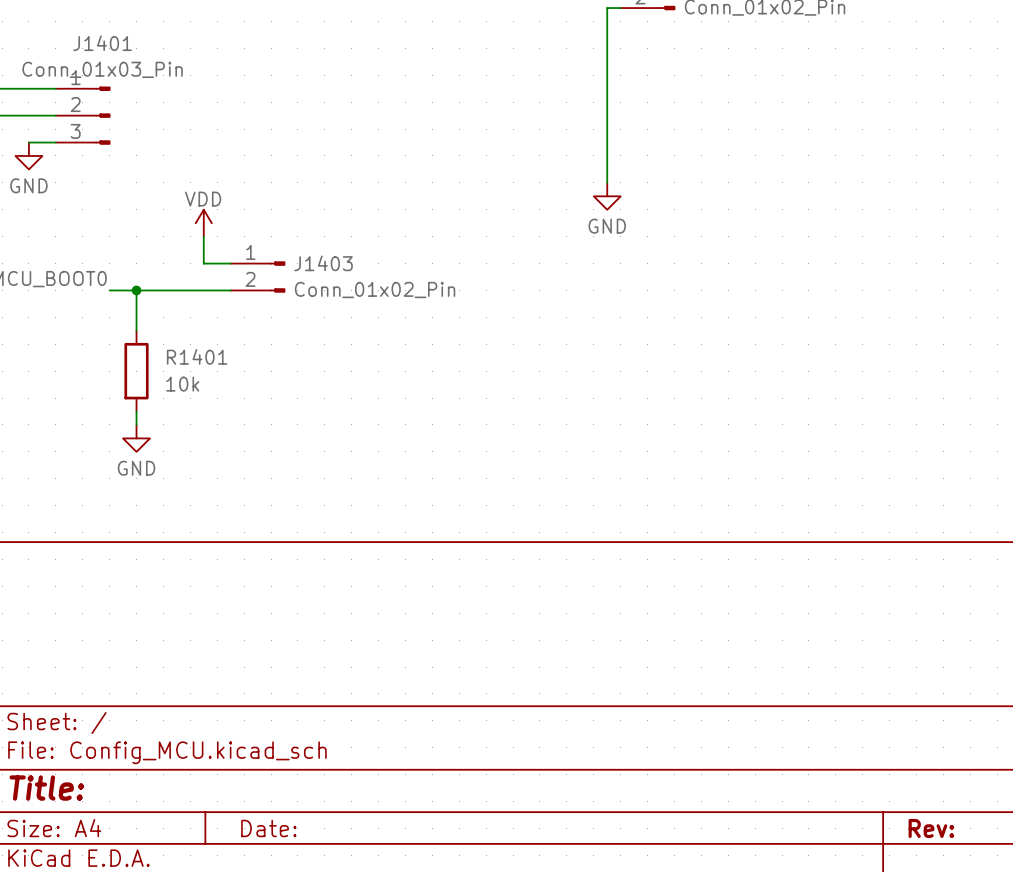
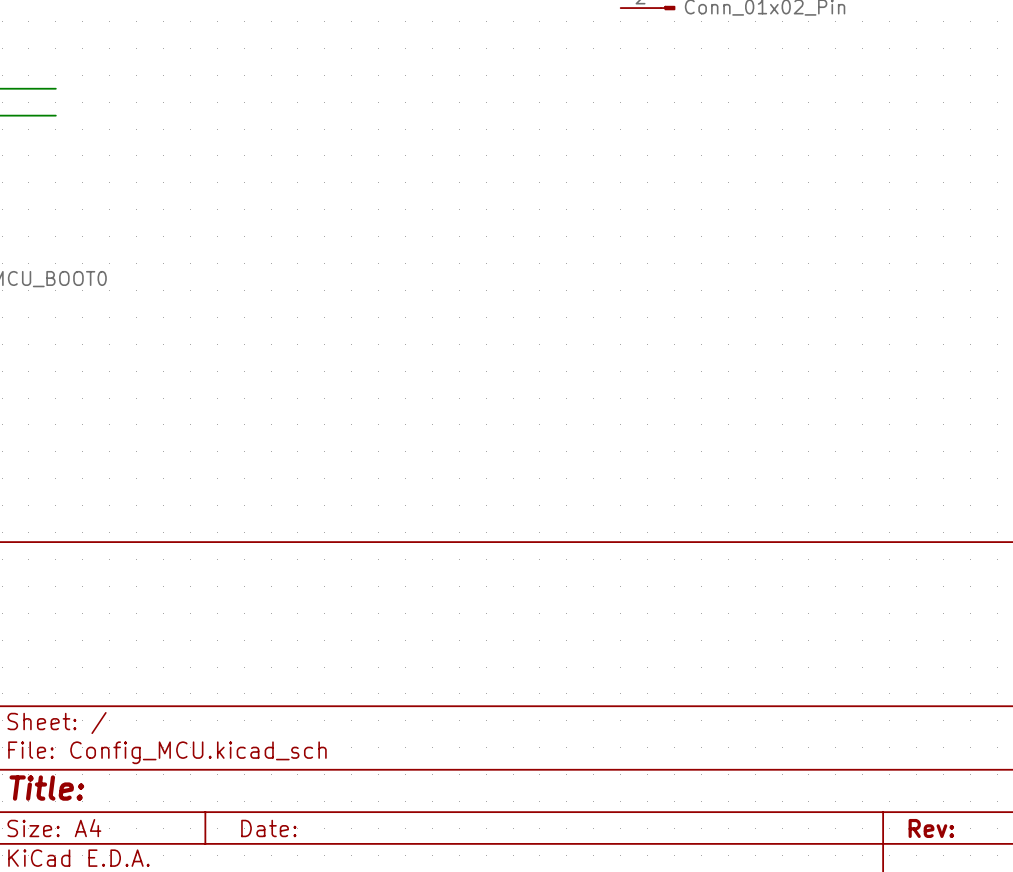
wire: (620, 8) (607, 8) (607, 182) -> none
J1401: Conn_01x03_Pin (83, 115) -> none
wire: (28, 142) (55, 142) -> none
power symbol: GND (28, 155) -> none
power symbol: GND (607, 196) -> none
power symbol: VDD (203, 223) -> none
wire: (203, 236) (203, 263) (230, 263) -> none
J1403: Conn_01x02_Pin (257, 277) -> none
wire: (109, 290) (230, 290) -> none
wire: (136, 290) (136, 330) -> none
junction: (136, 290) -> none
R1401: 10k (136, 371) -> none
wire: (136, 411) (136, 424) -> none
power symbol: GND (136, 438) -> none

